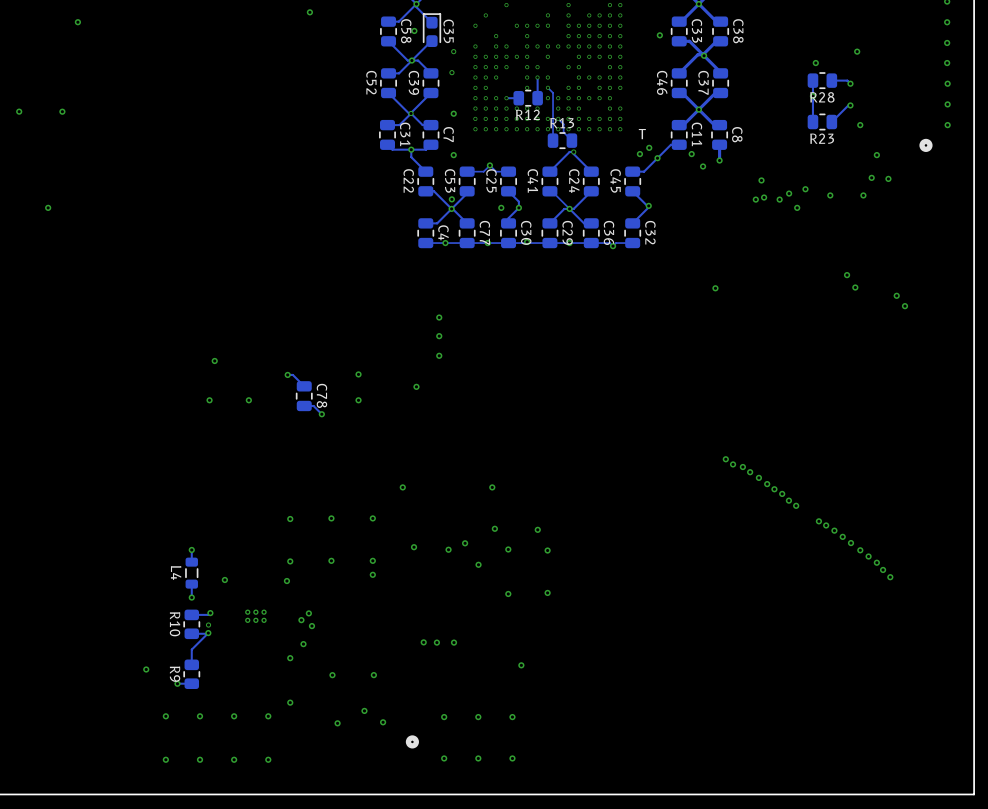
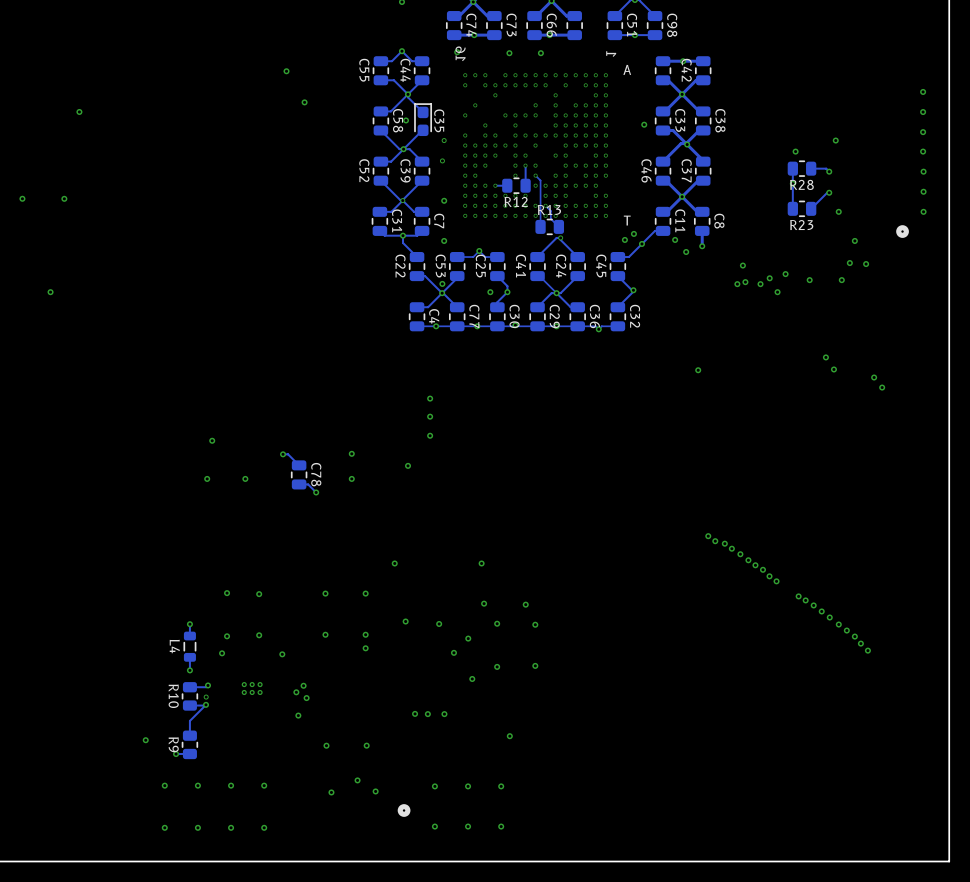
via: none -> (227, 593)
via: none -> (259, 594)
via: (290, 519) -> none
via: (465, 543) -> none
via: none -> (259, 635)
via: (290, 561) -> none
via: none -> (227, 636)
via: none -> (453, 652)
via: none -> (472, 678)
via: (290, 658) -> none
via: (290, 702) -> none

